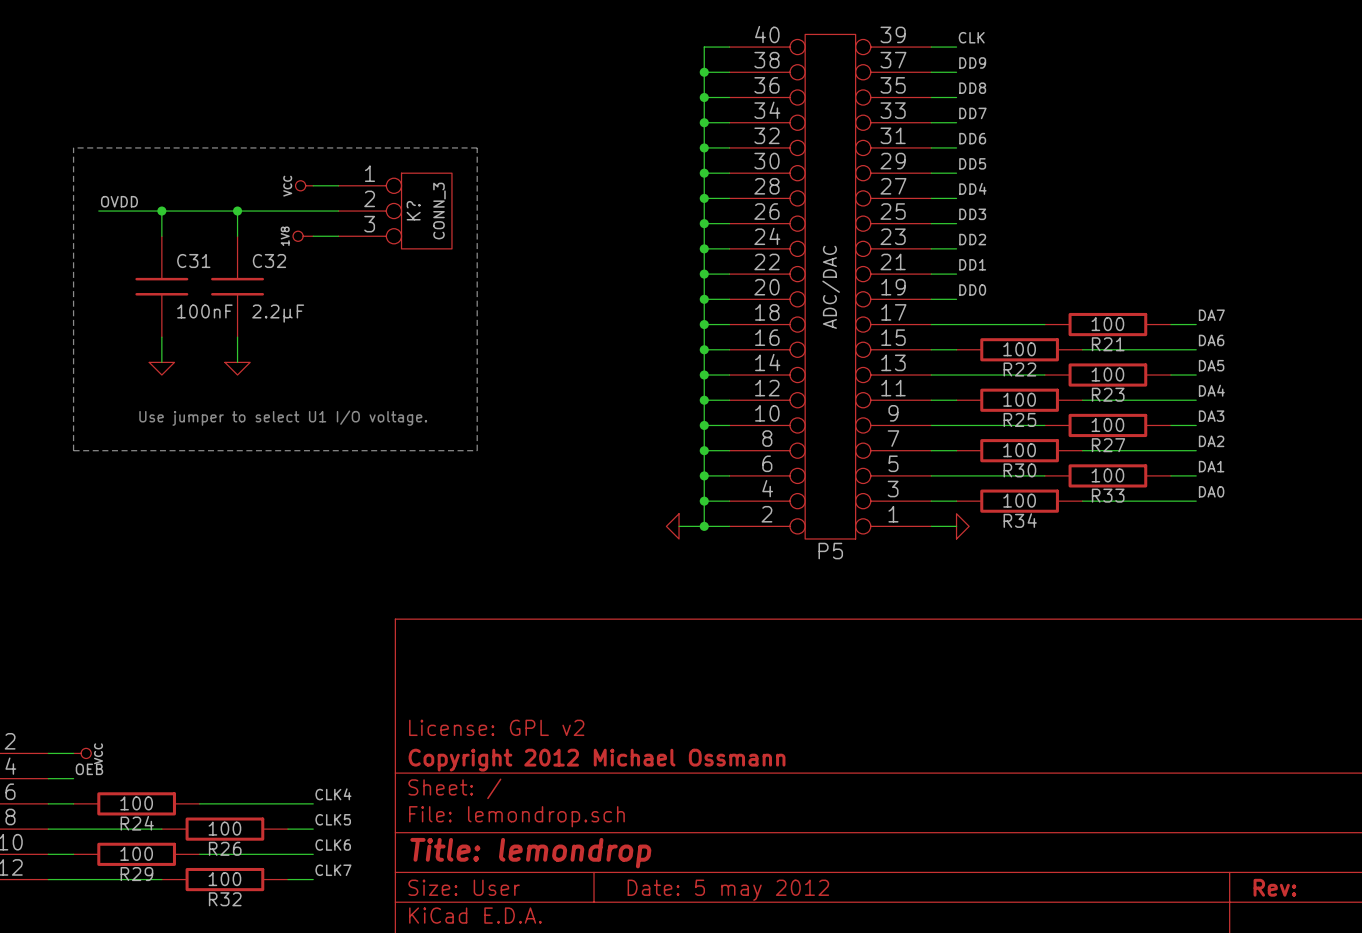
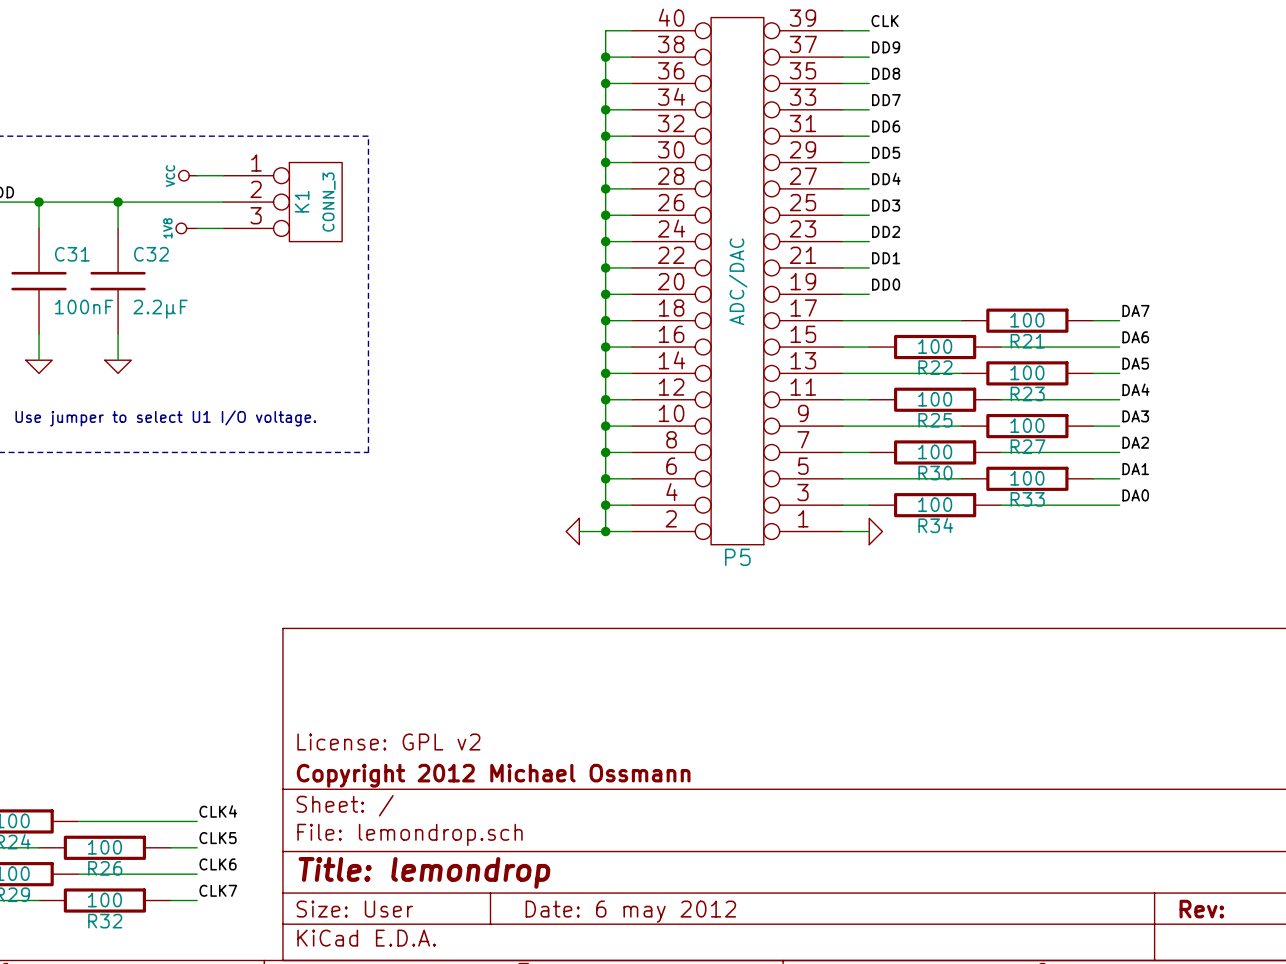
K? name: K? (413, 210) -> K1 (302, 201)
title block: Date: 5 may 2012 (728, 890) -> Date: 6 may 2012 (630, 911)

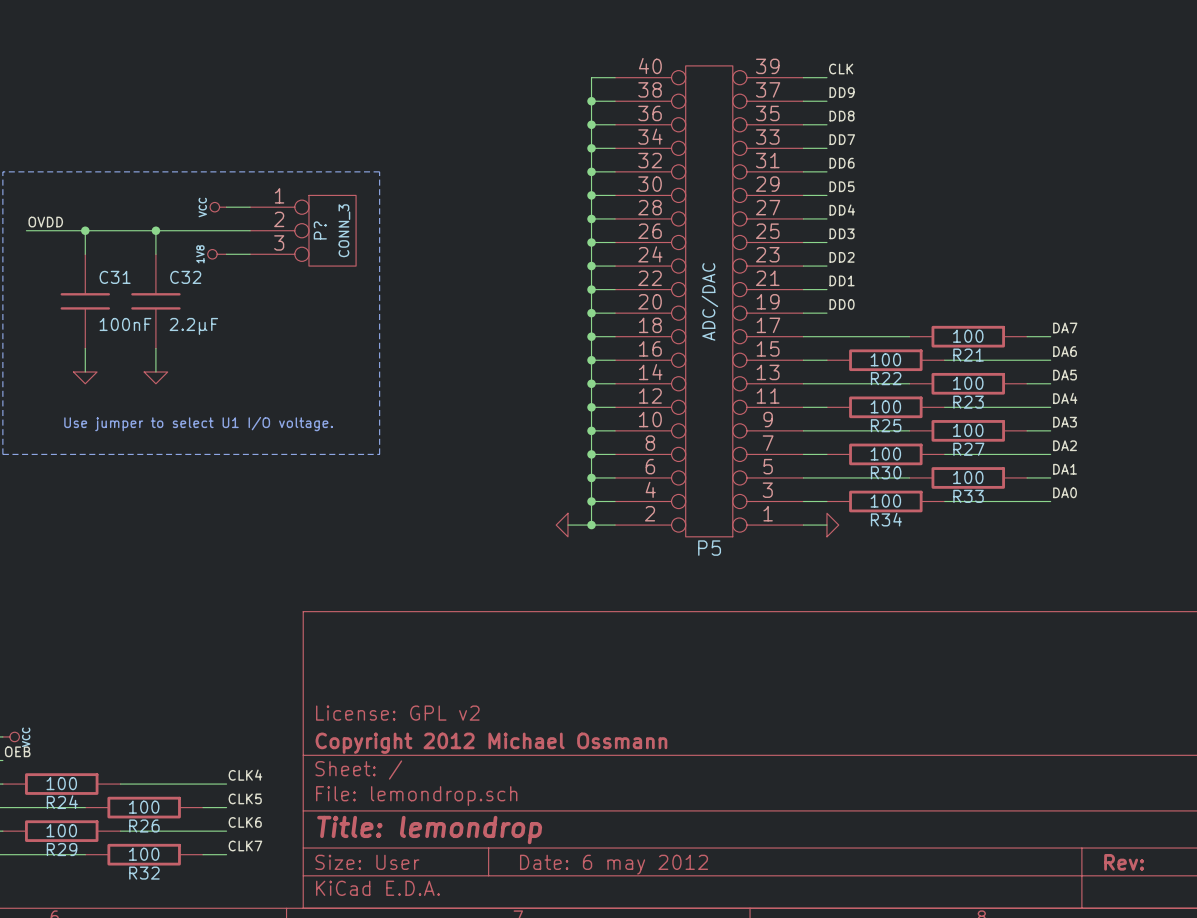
K1 name: K1 (302, 201) -> P? (320, 230)

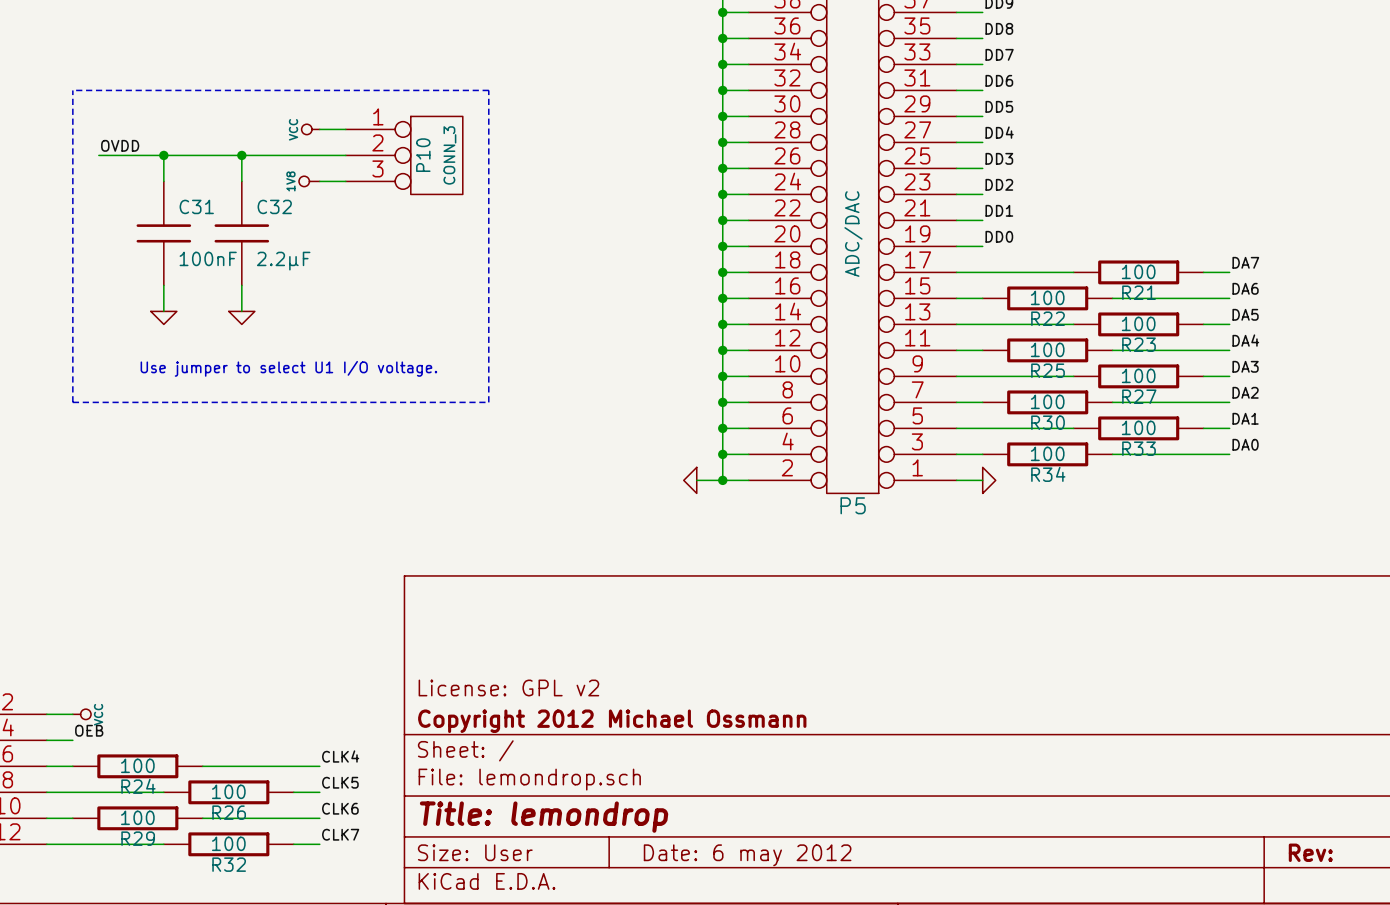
P? name: P? (320, 230) -> P10 (423, 155)

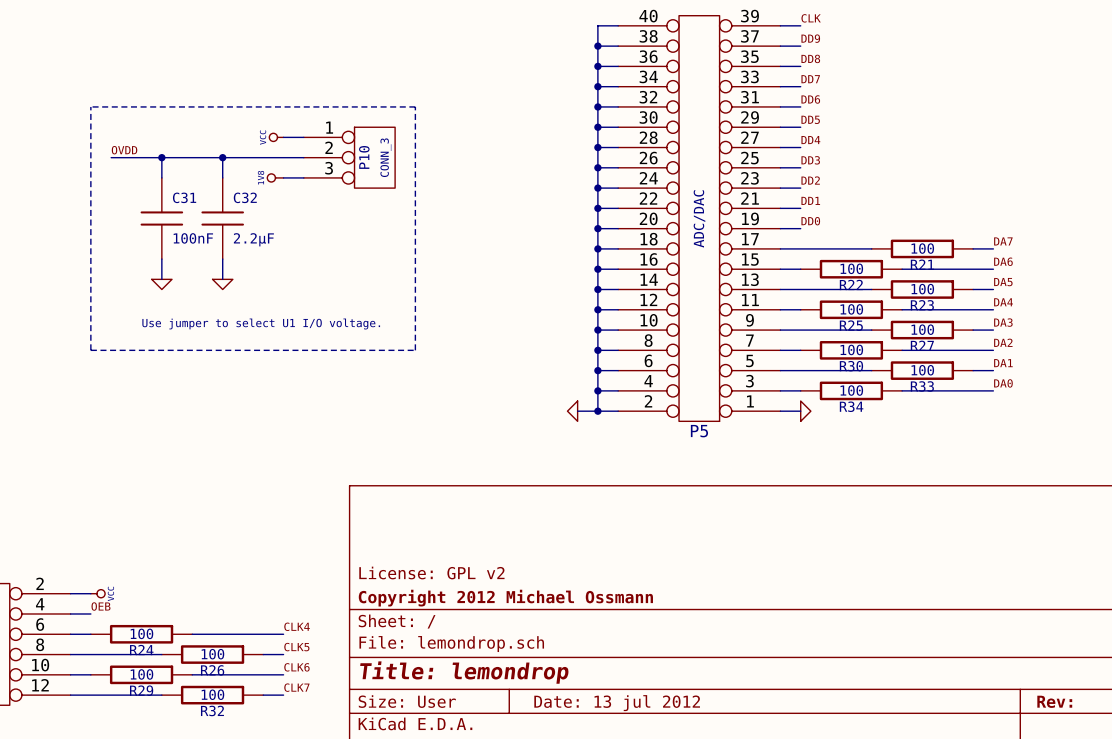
title block: Date: 6 may 2012 (747, 855) -> Date: 13 jul 2012 (617, 703)

